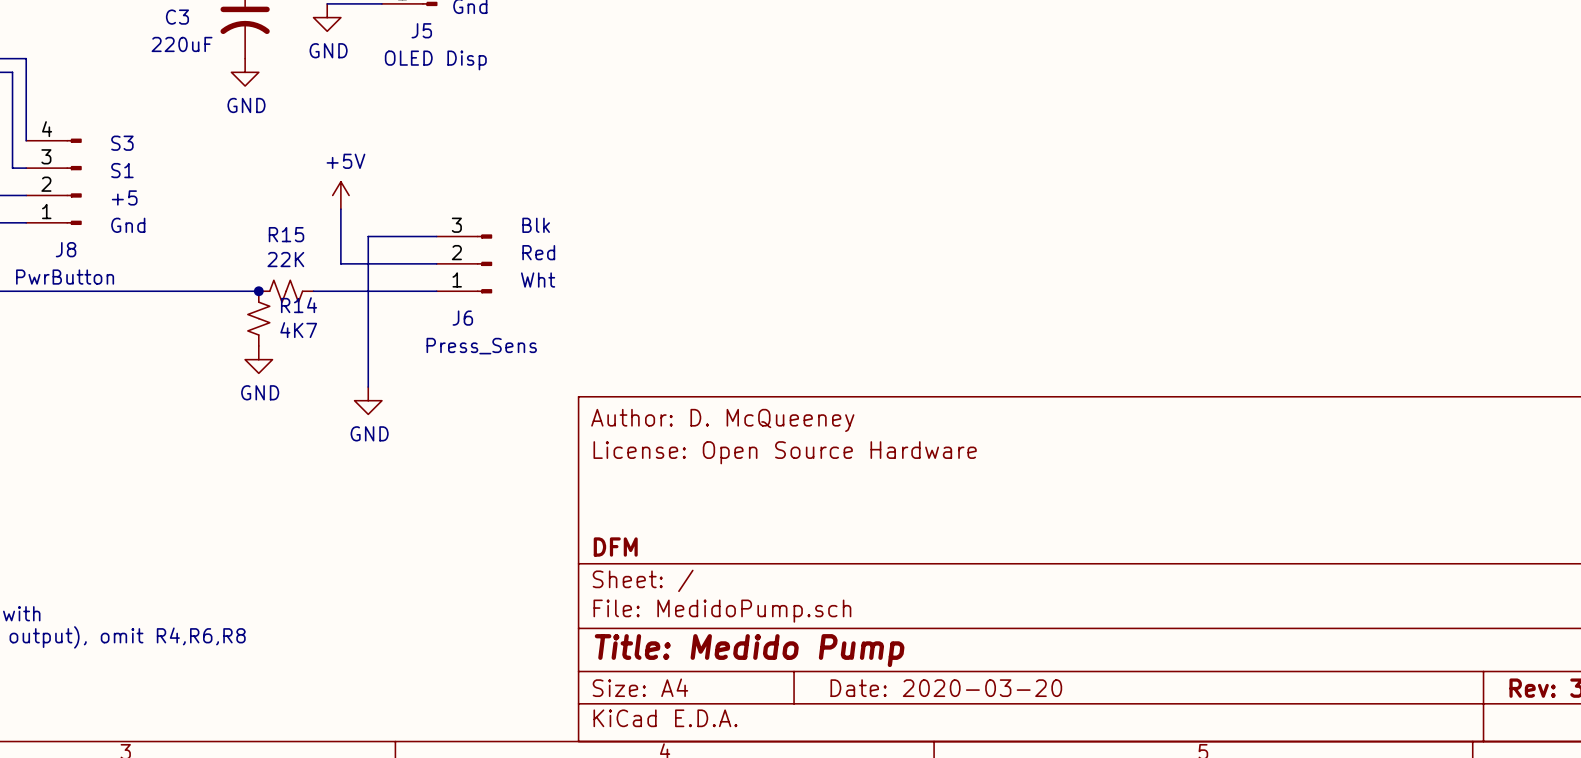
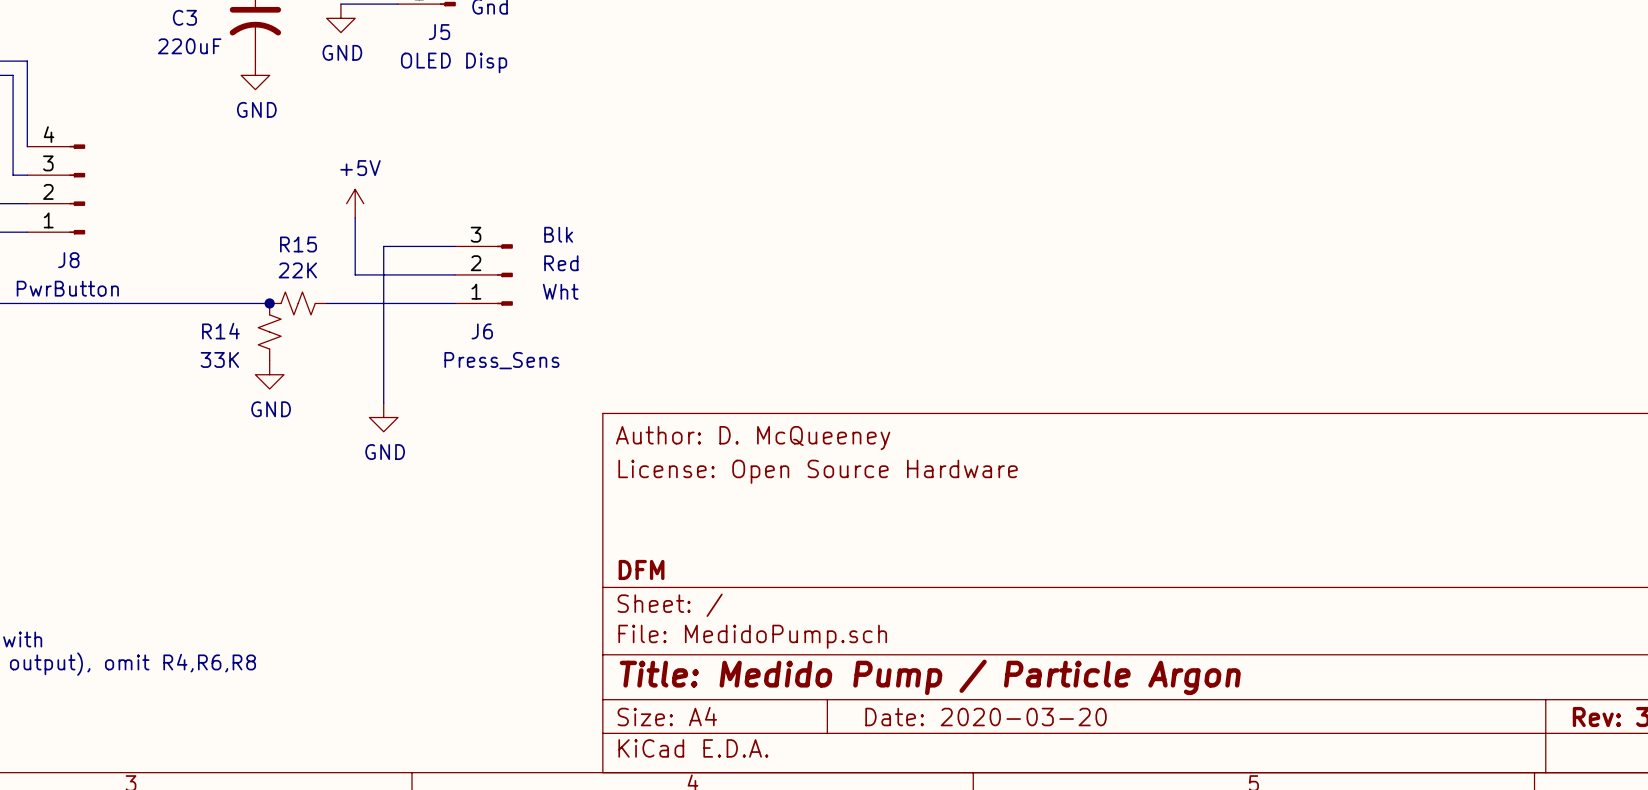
text: S3 (122, 143) -> none
text: S1 (122, 170) -> none
text: +5 (124, 197) -> none
text: Gnd (128, 225) -> none
R14 name position: R14 (299, 305) -> R14 (220, 331)
R14 value: 4K7 (298, 330) -> 33K (219, 359)
title block: Title: Medido Pump (749, 650) -> Title: Medido Pump / Particle Argon (930, 677)

